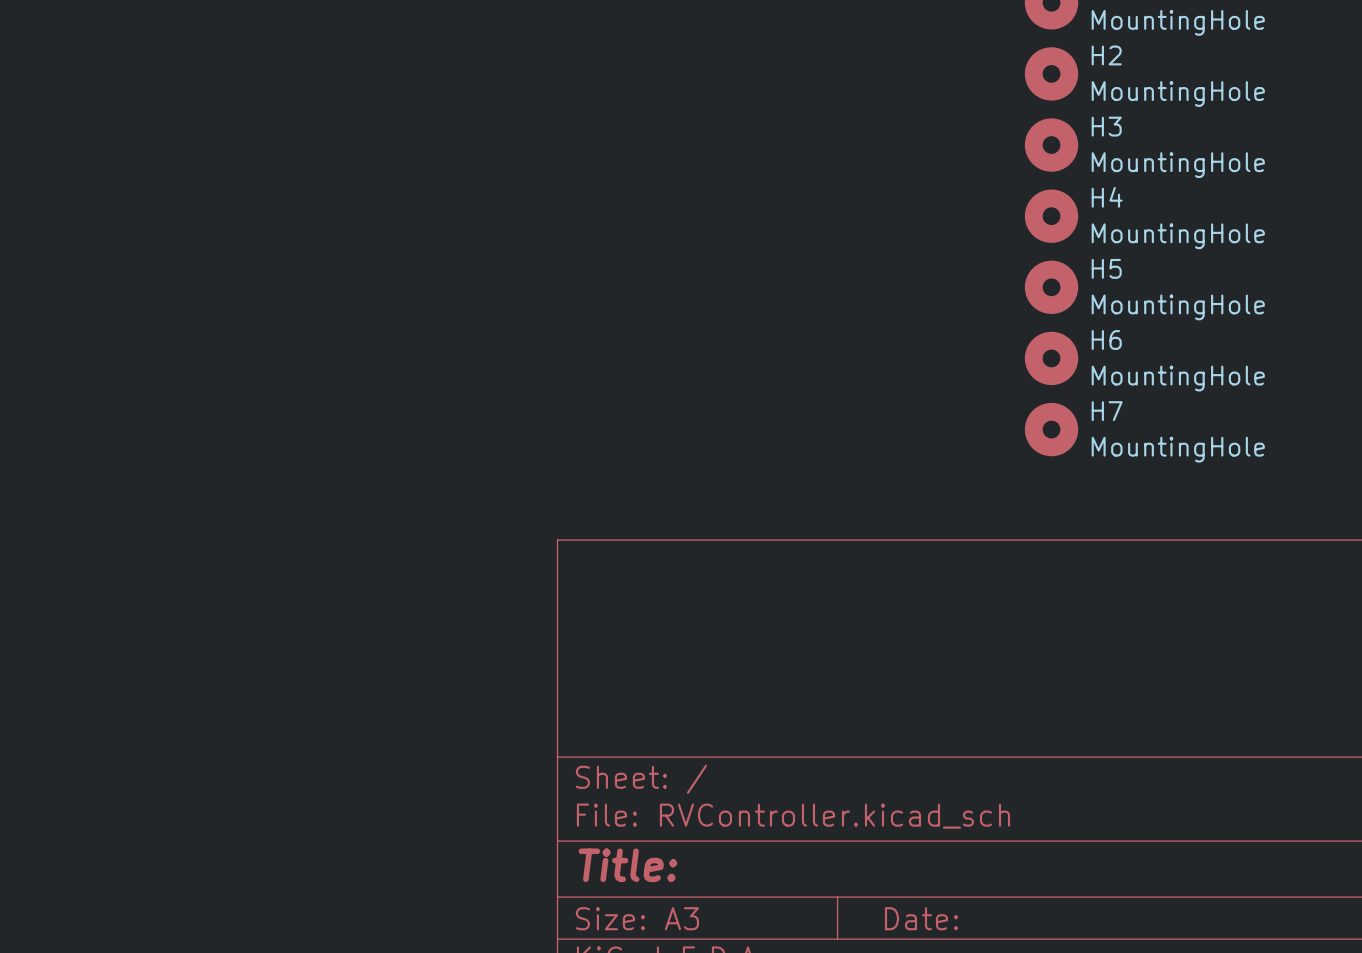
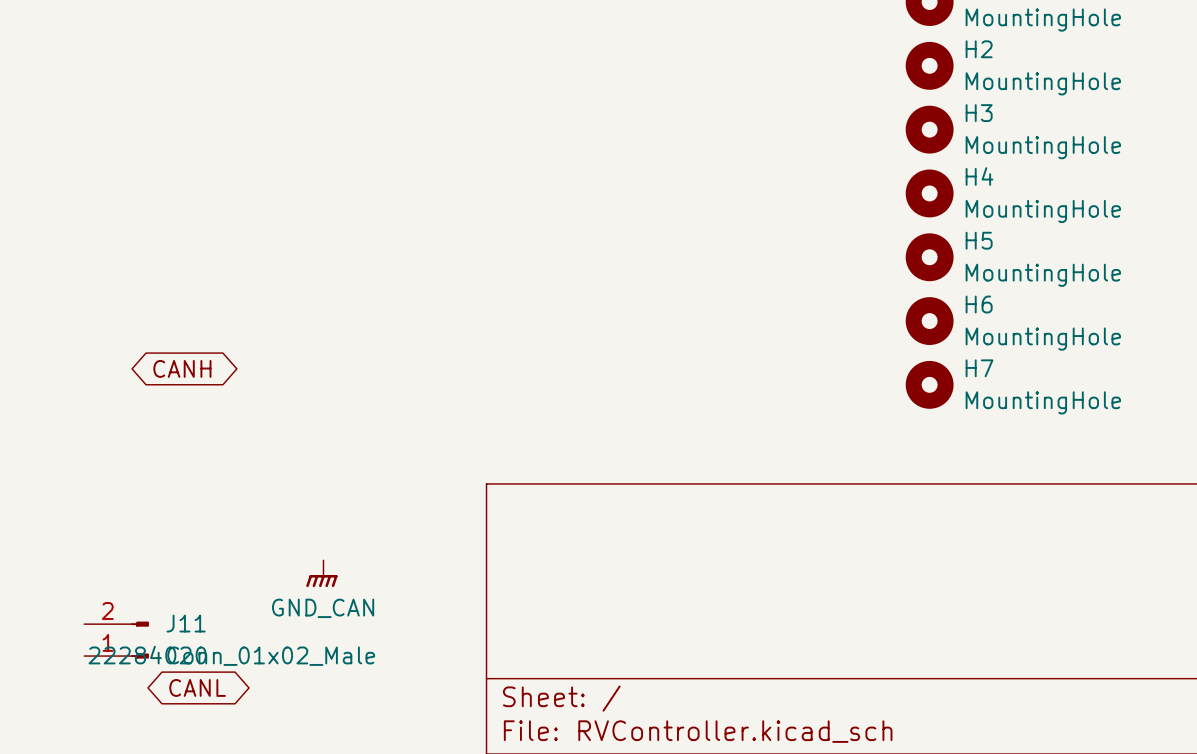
global label: none -> CANH (182, 368)
power symbol: none -> GND_CAN (321, 573)
J11: none -> Conn_01x02_Male (116, 640)
global label: none -> CANL (197, 687)

